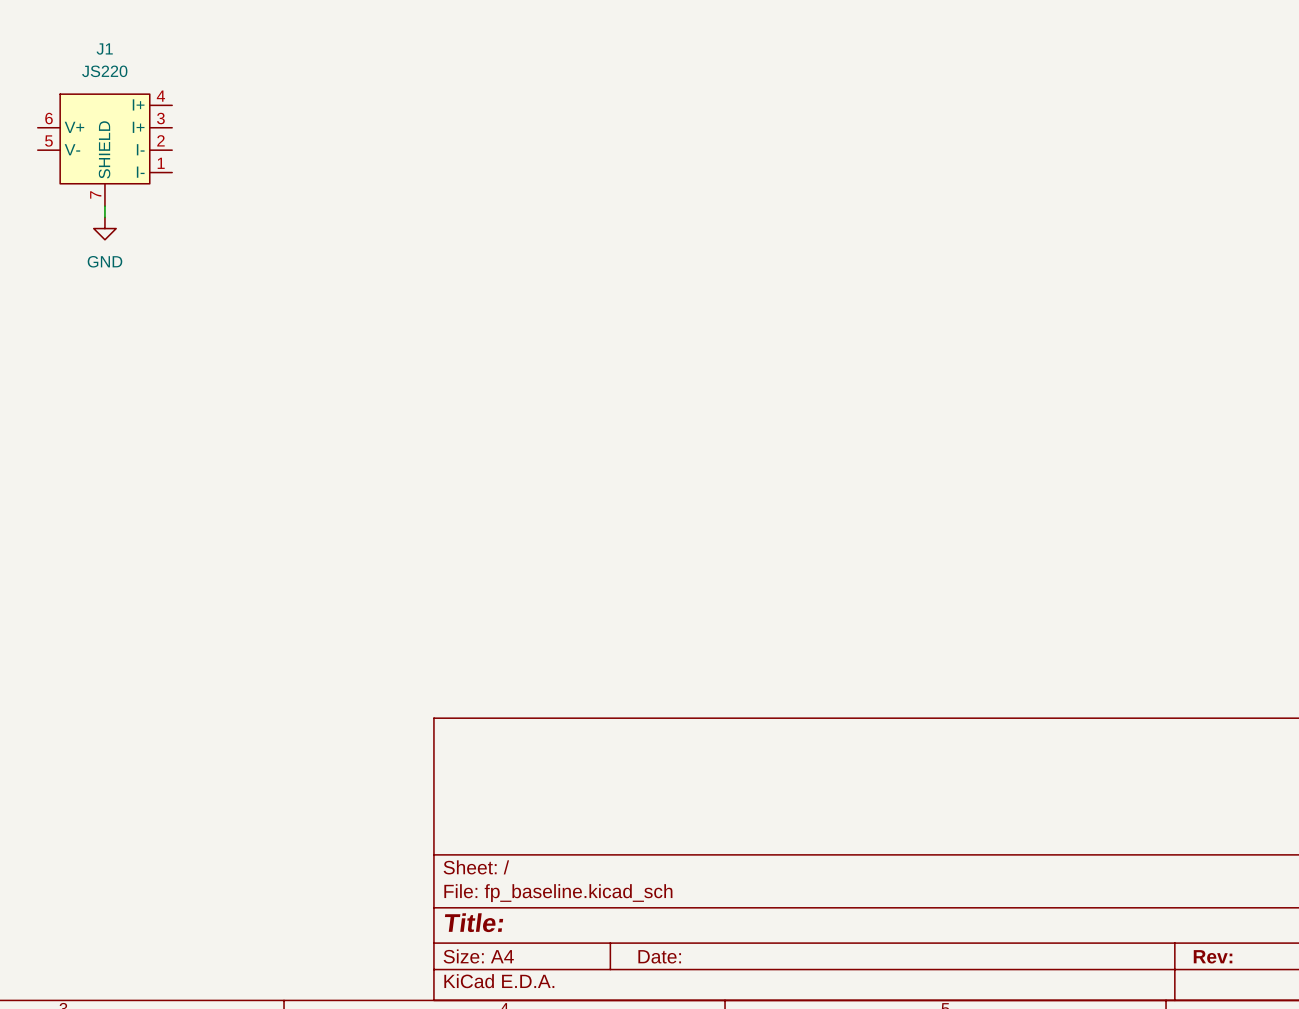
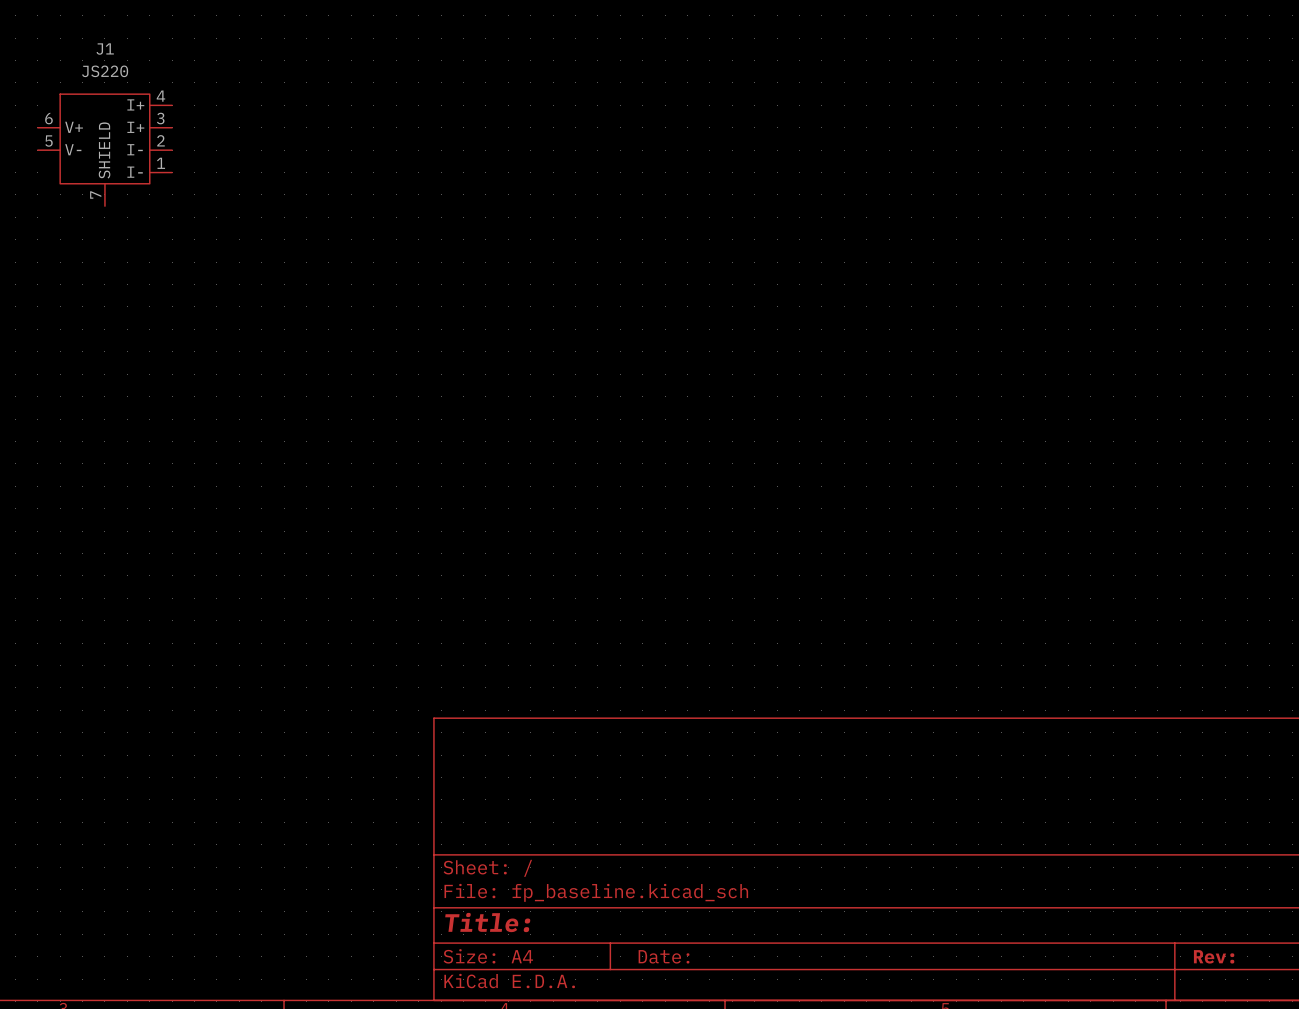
wire: (104, 206) (104, 217) -> none
power symbol: GND (104, 228) -> none

